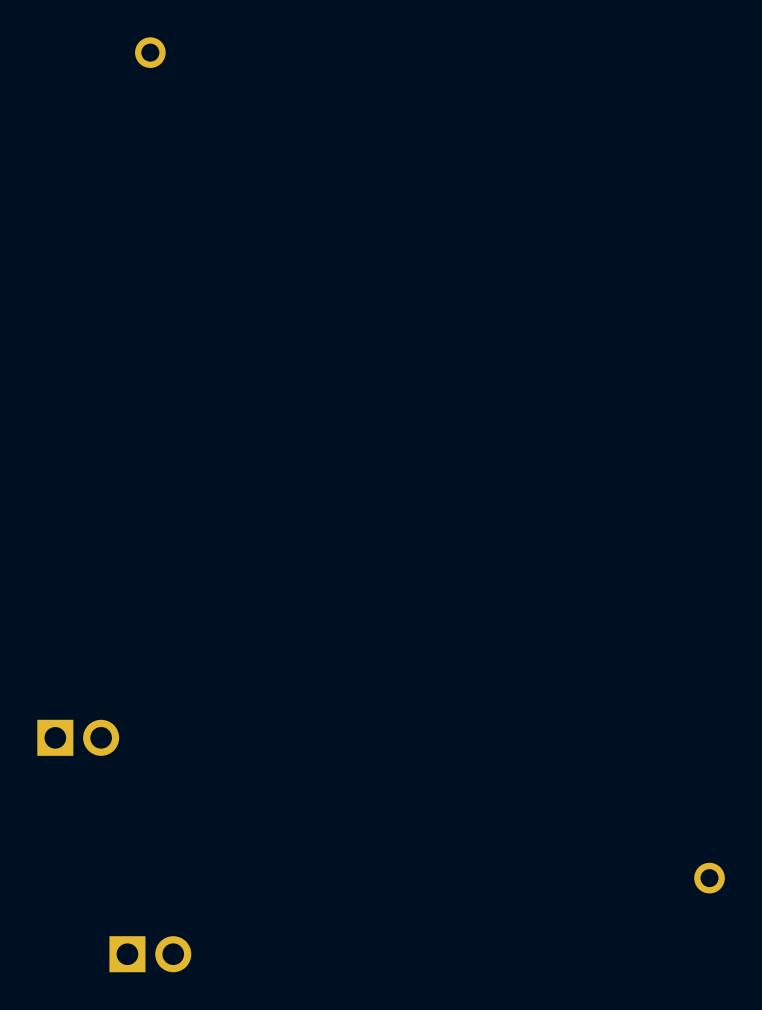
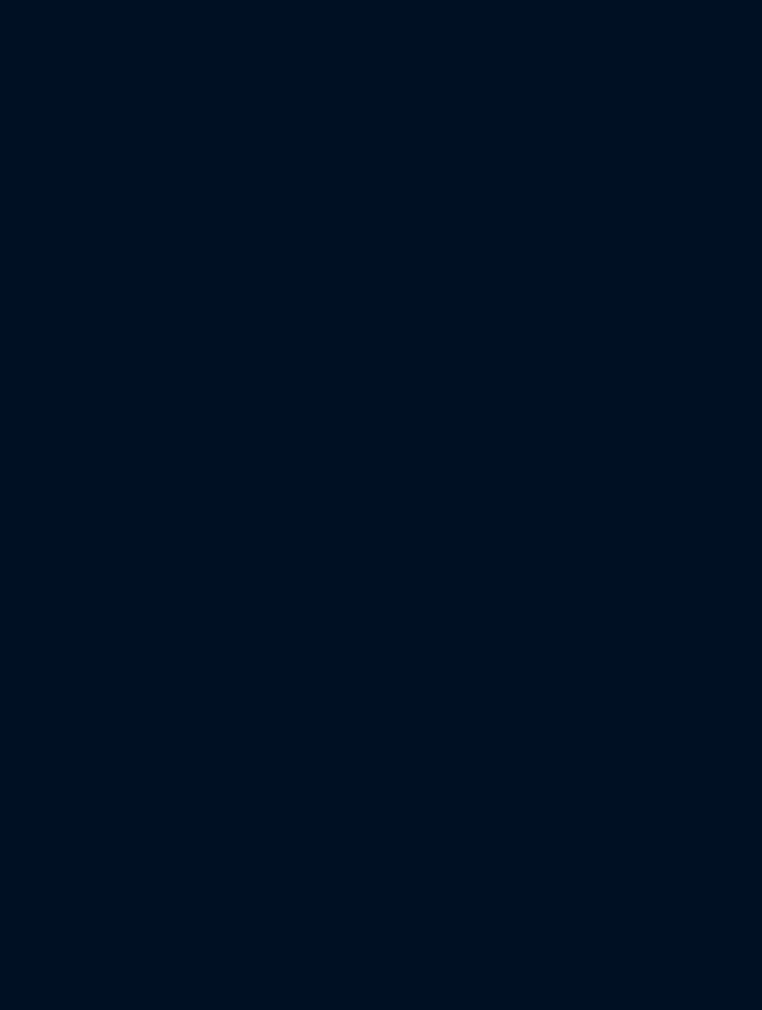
part: (150, 52) -> none
part: (78, 737) -> none
part: (709, 878) -> none
part: (150, 954) -> none

